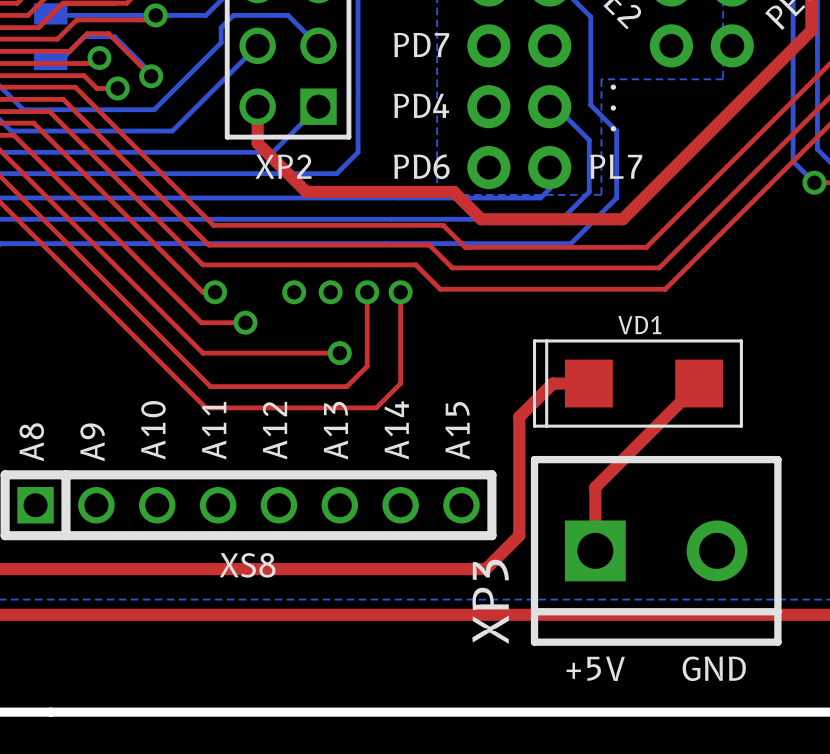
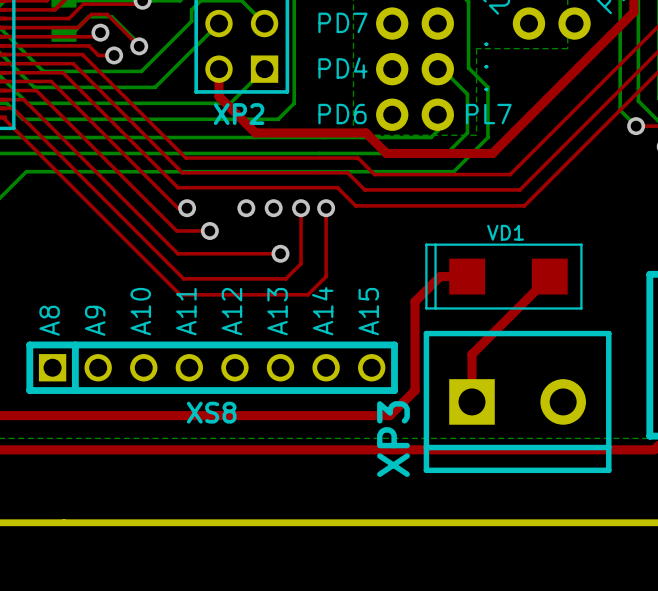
text: +5V (595, 668) -> none
text: GND (714, 668) -> none

